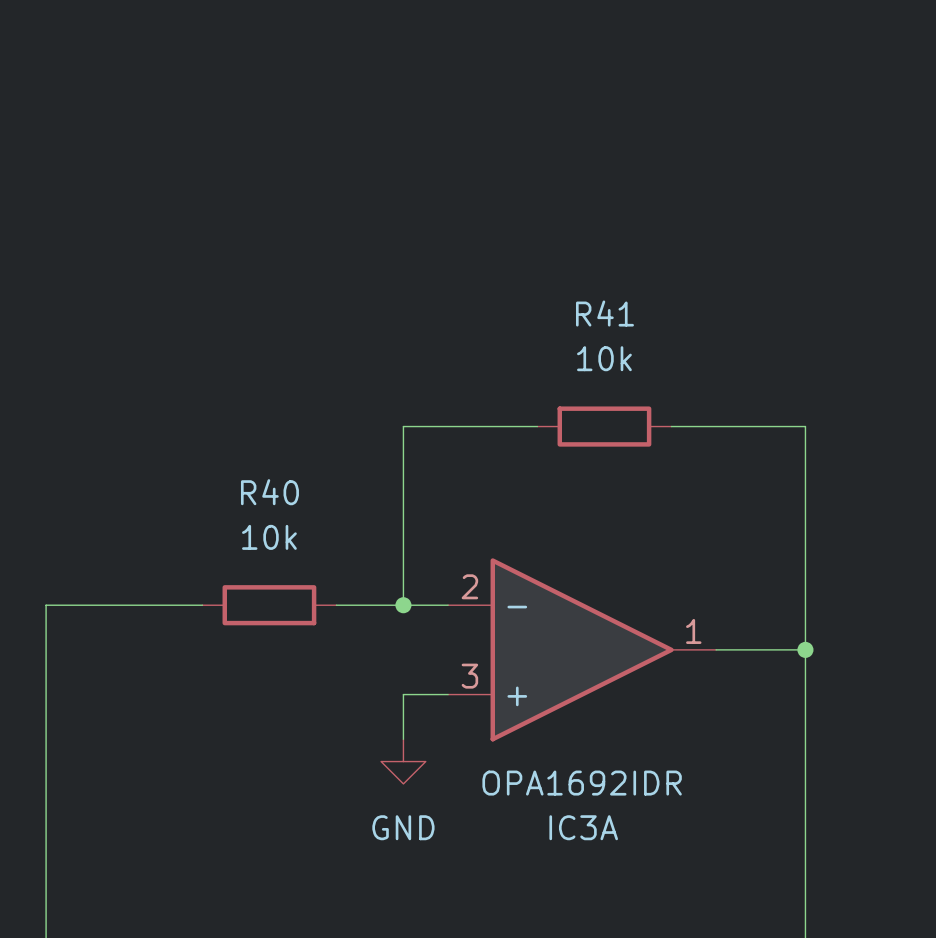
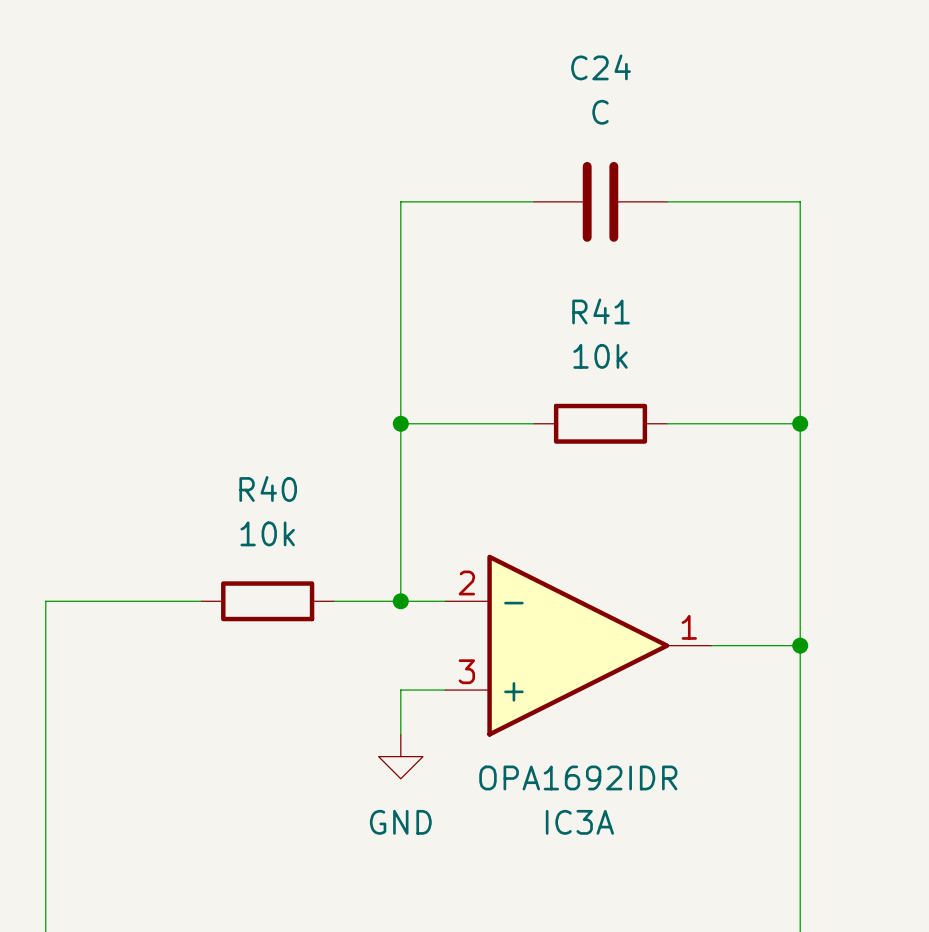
wire: none -> (533, 201) (400, 201) (400, 423)
C24: none -> C (600, 201)
wire: none -> (667, 201) (800, 201) (800, 423)
junction: none -> (400, 423)
junction: none -> (800, 423)

